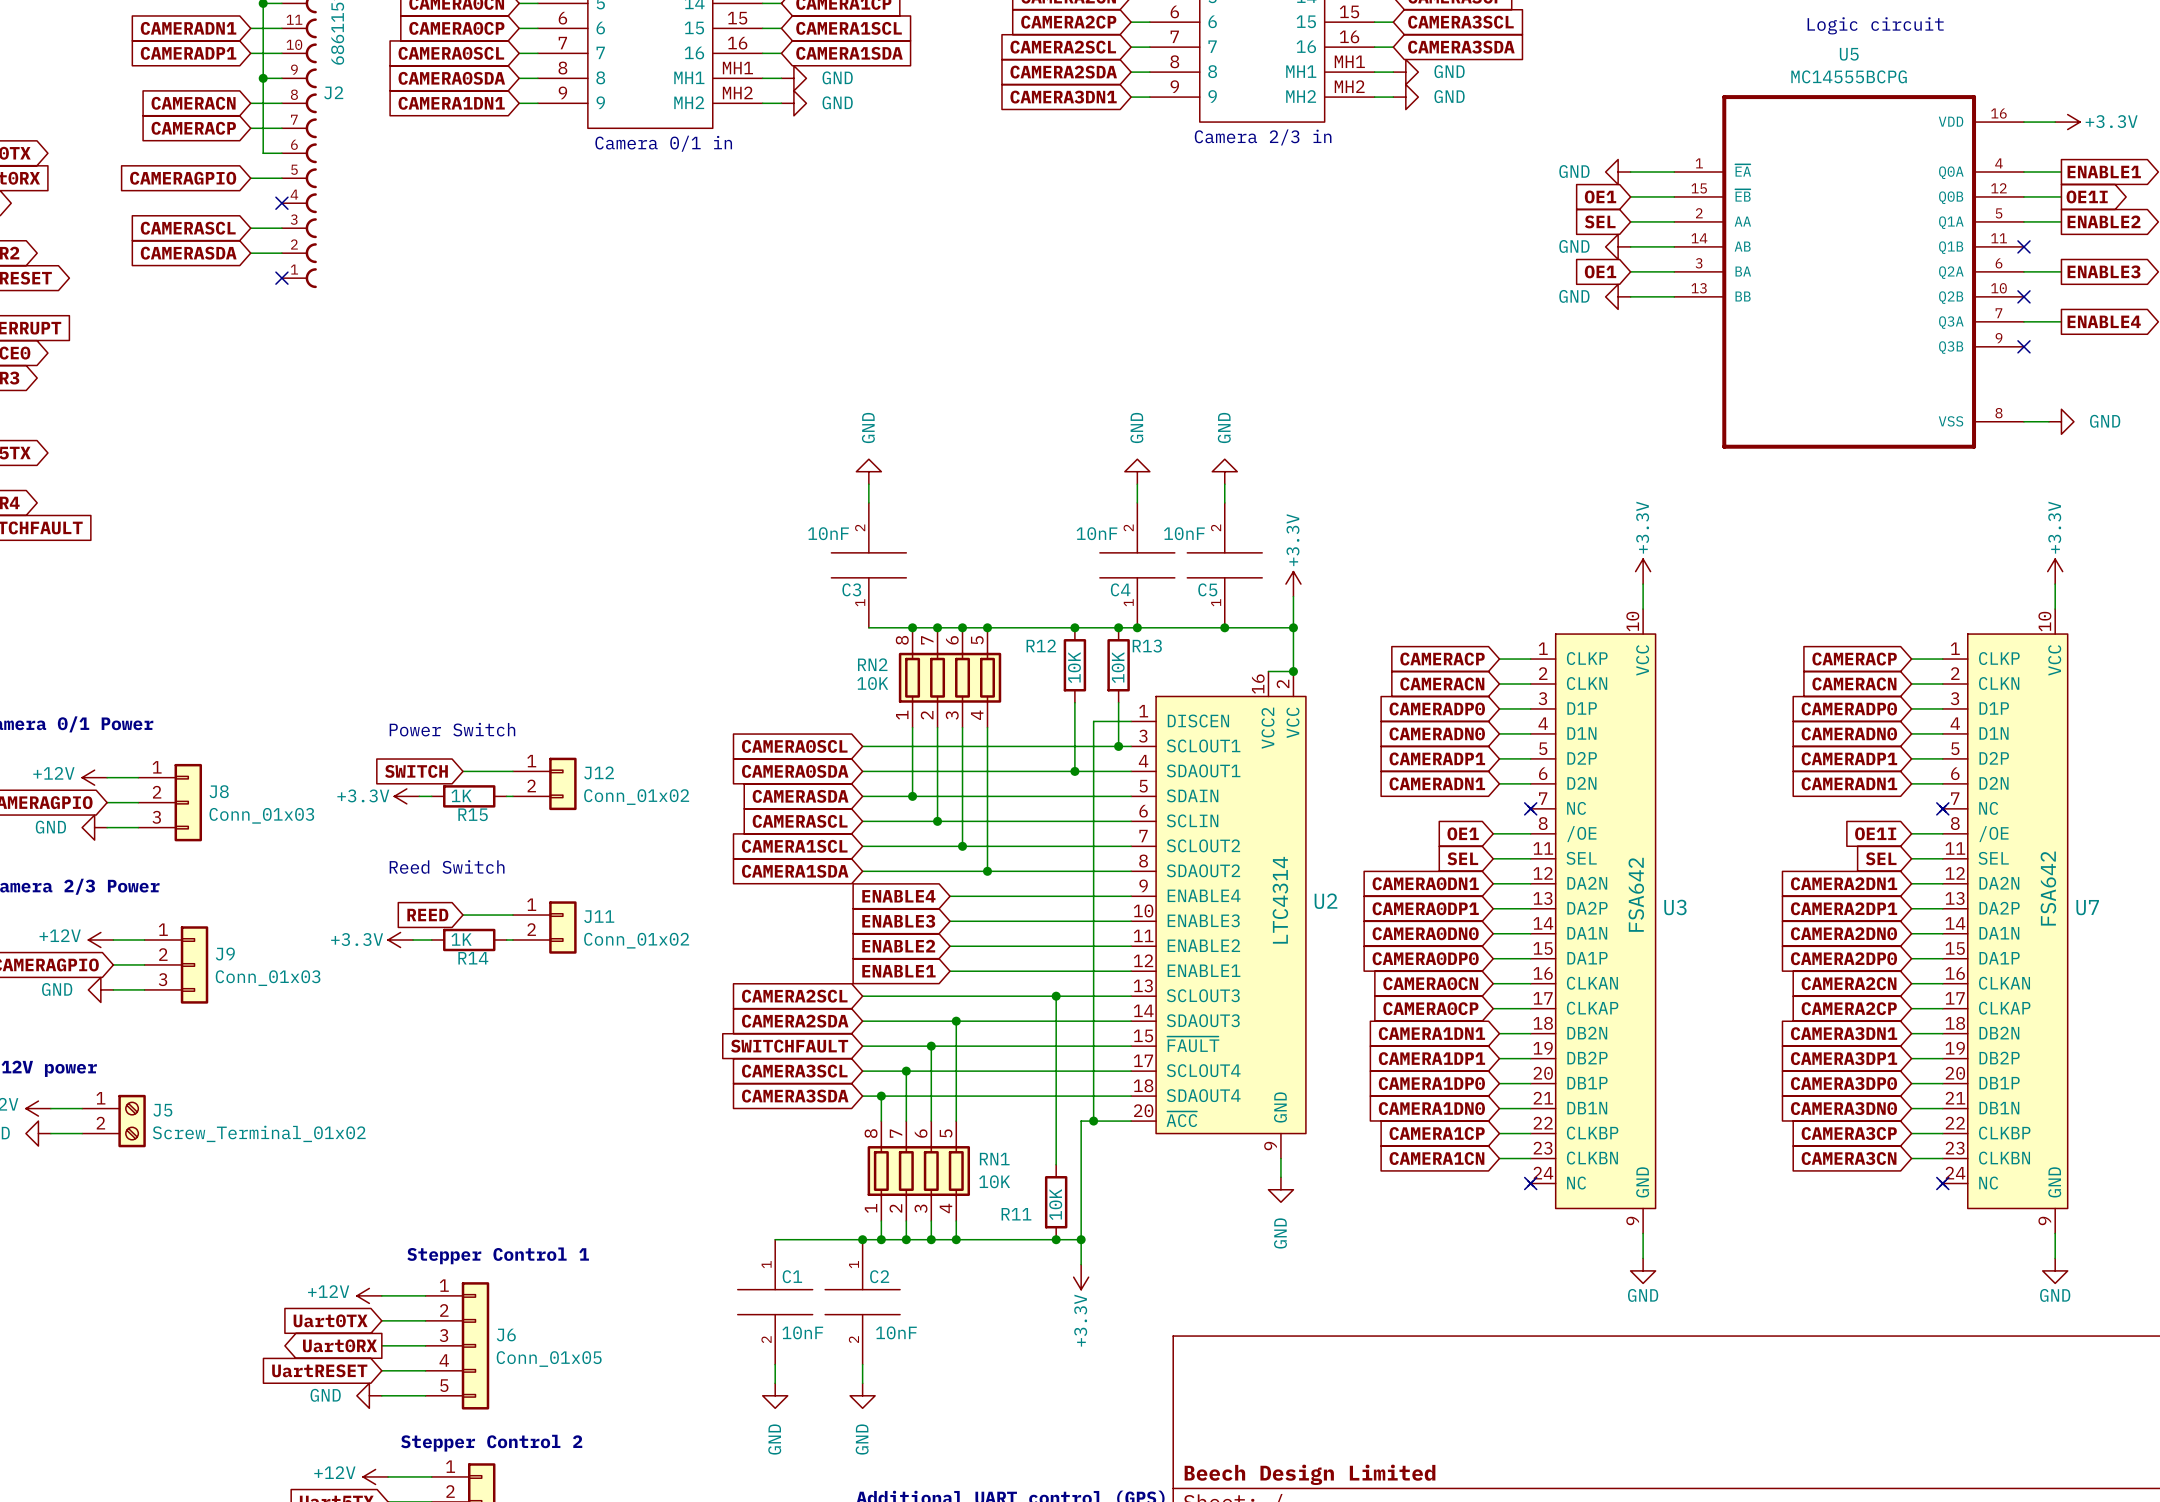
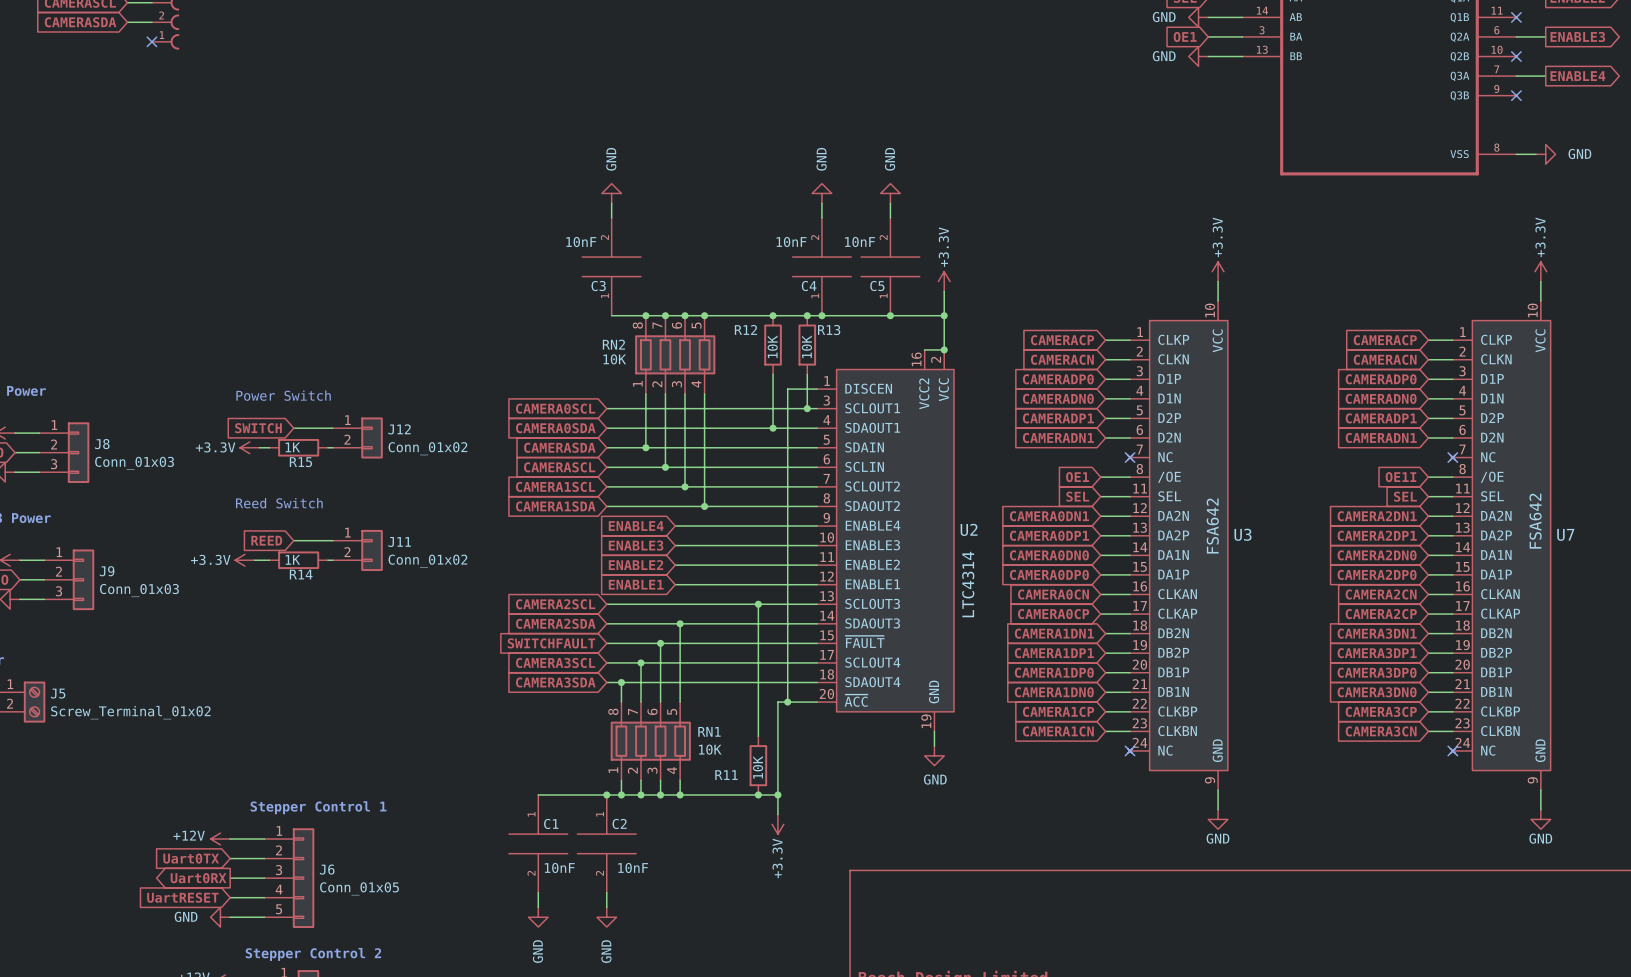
U2 value position: LTC4314 (1280, 900) -> LTC4314 (968, 584)
U2 pin number: 9 (1270, 1146) -> 19 (926, 721)
power symbol text rotation: 0° (1280, 1233) -> 90° clockwise (935, 779)

